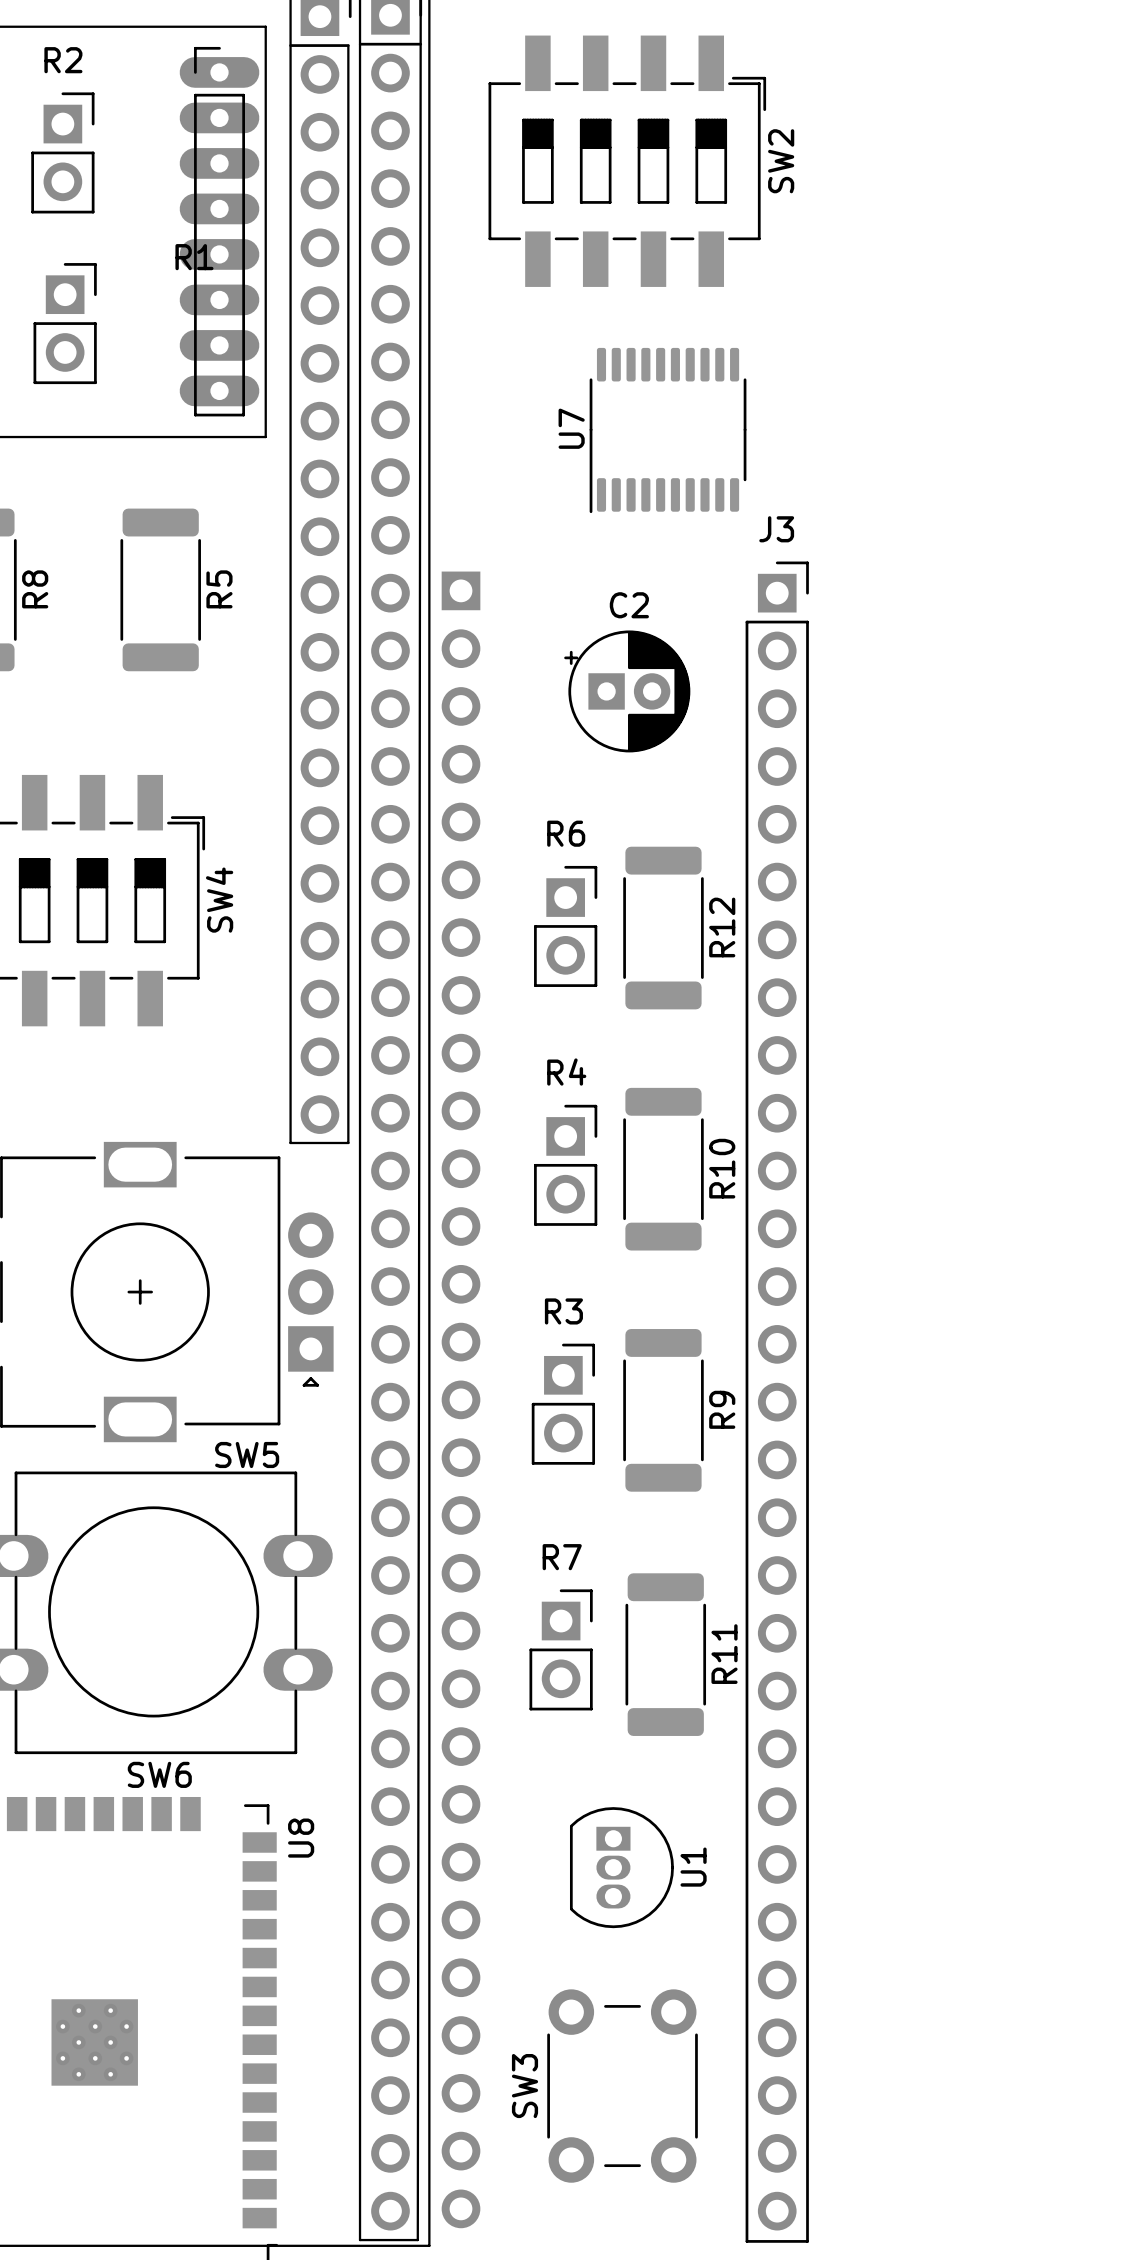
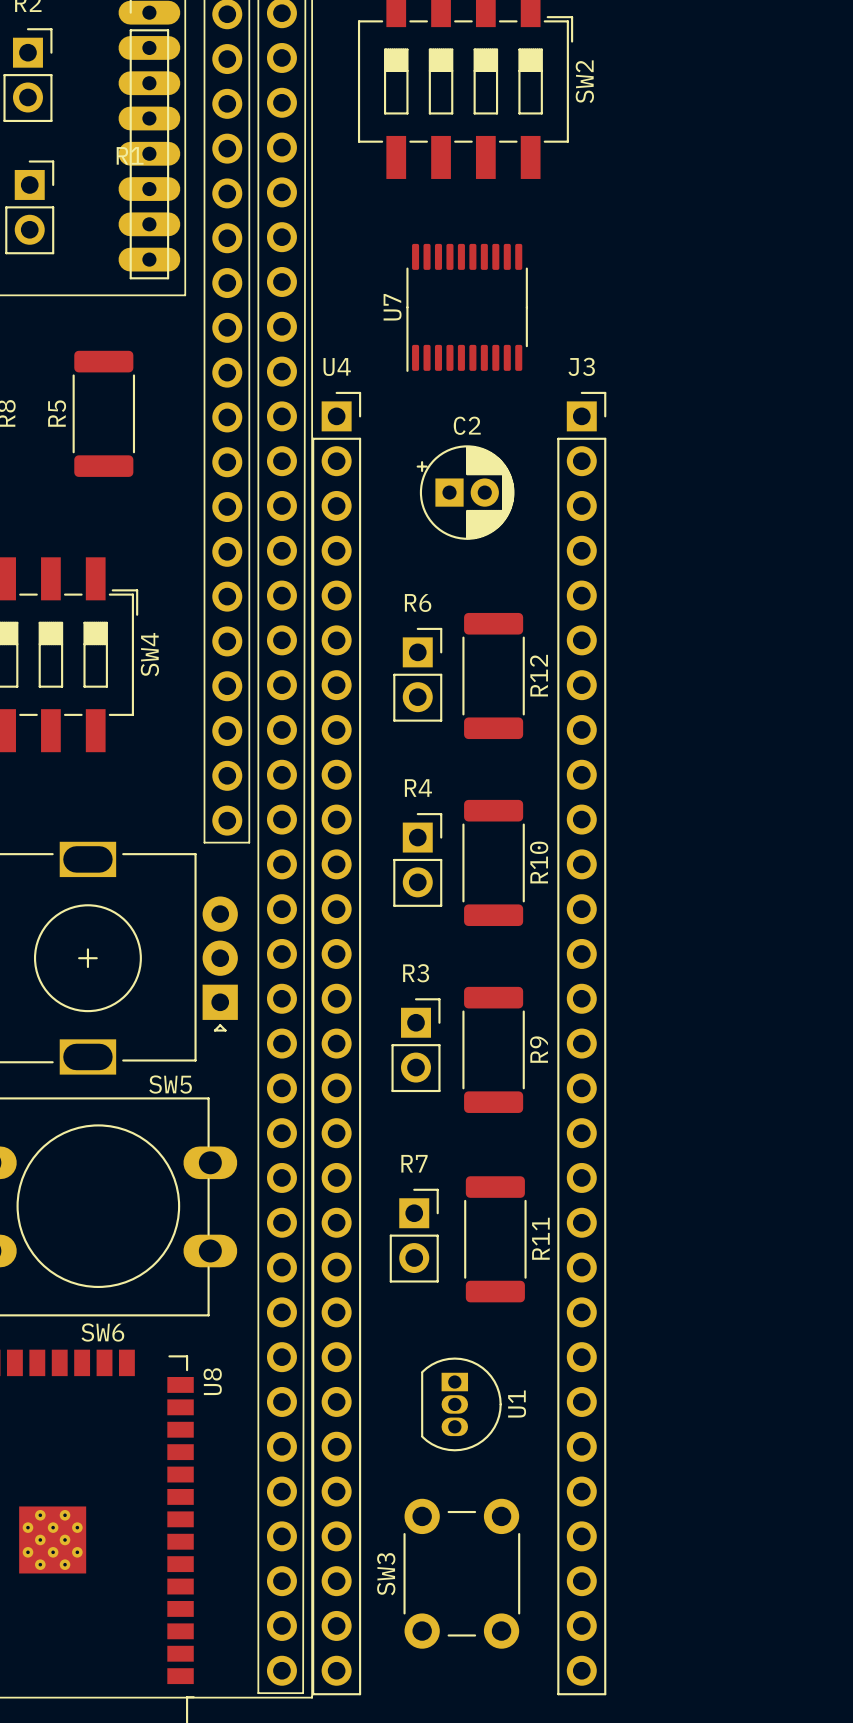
U7 position: (668, 430) -> (467, 307)
R5 name position: R5 (219, 589) -> R5 (57, 413)
U4 side: bottom (461, 1399) -> top (336, 1043)

